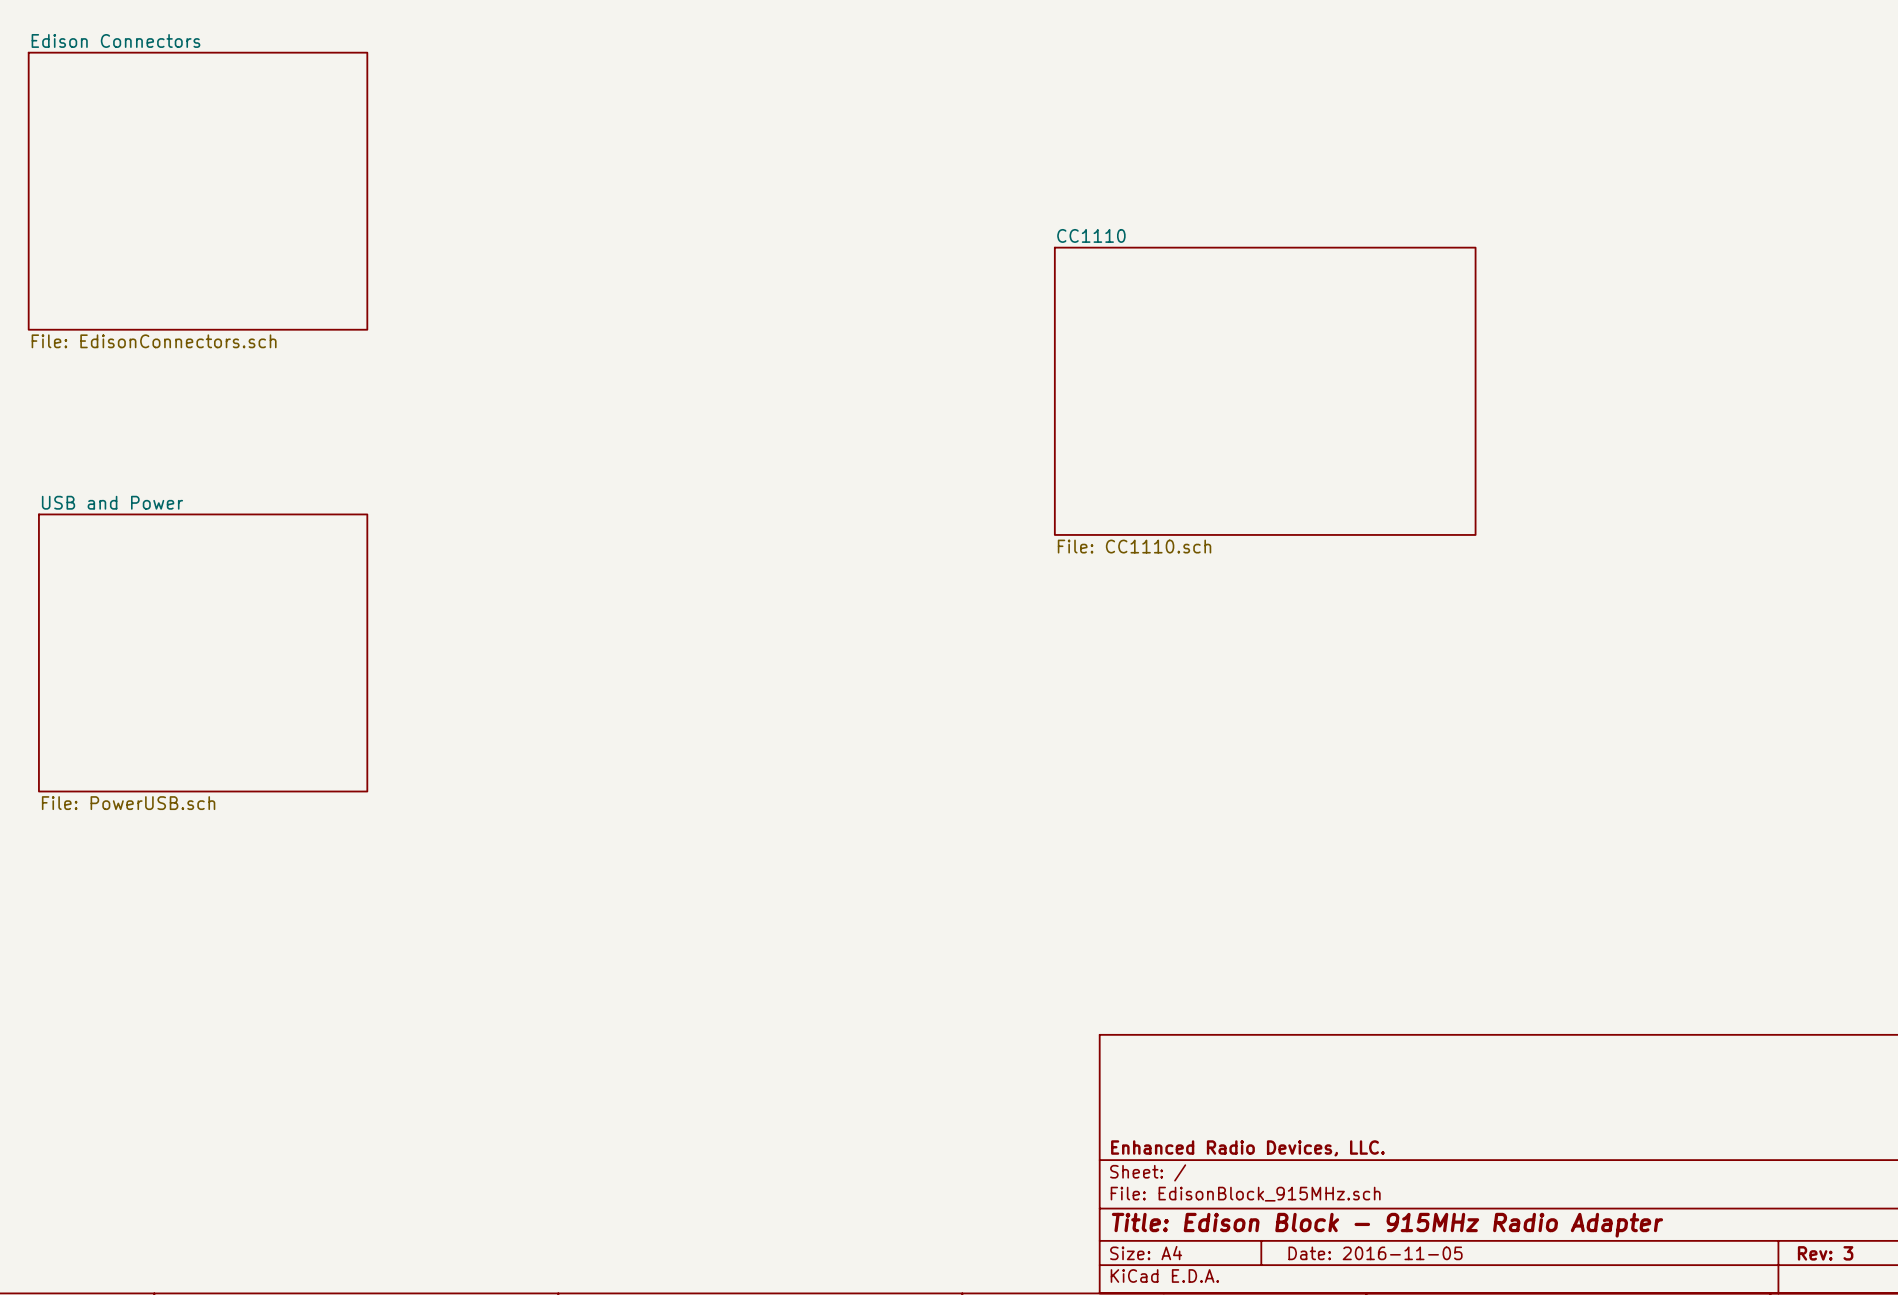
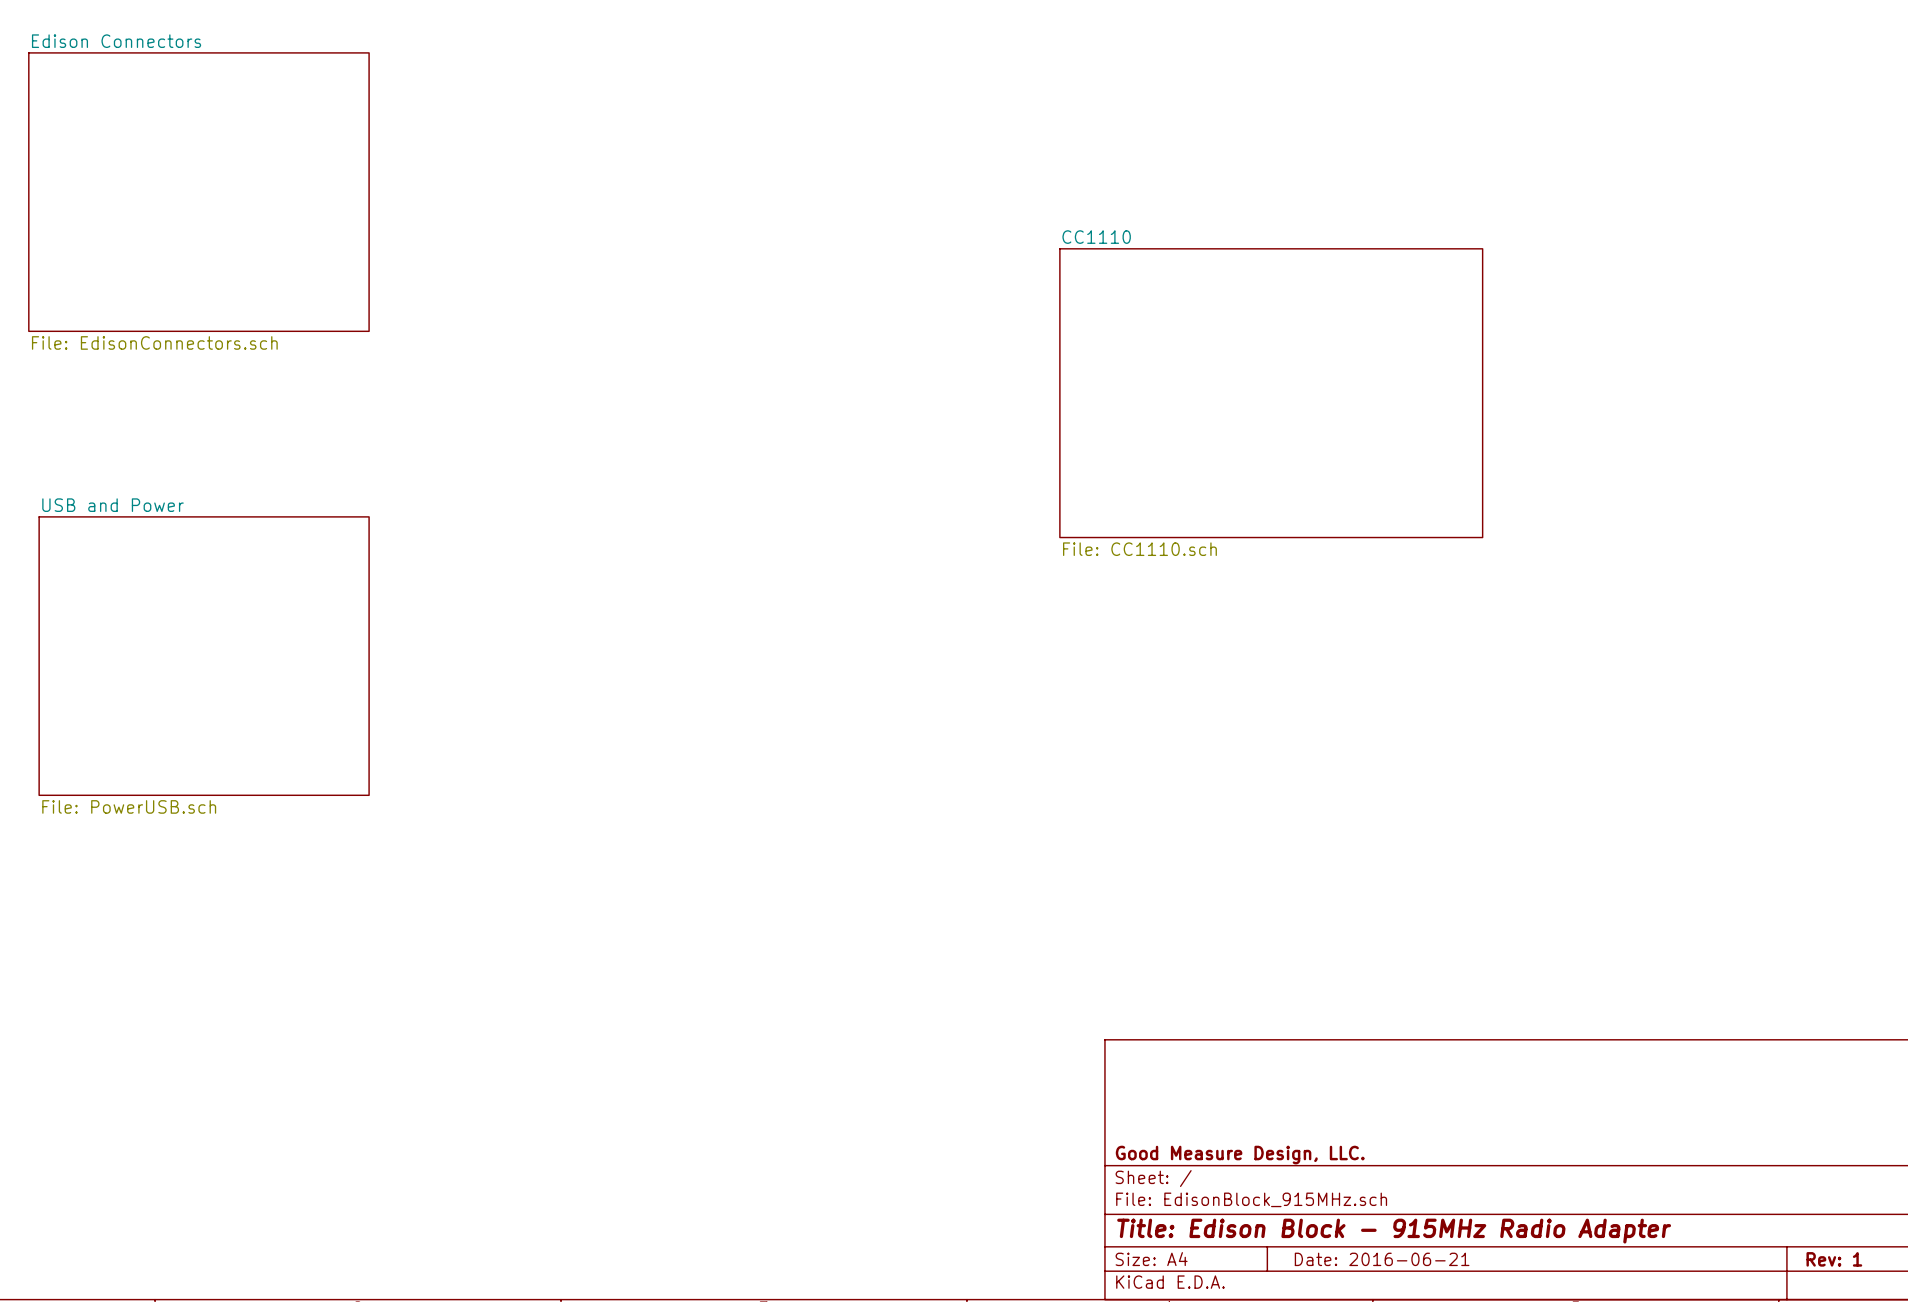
title block: Enhanced Radio Devices, LLC. (1247, 1148) -> Good Measure Design, LLC. (1240, 1155)
title block: Date: 2016-11-05 (1375, 1253) -> Date: 2016-06-21 (1382, 1259)
title block: Rev: 3 (1825, 1253) -> Rev: 1 (1834, 1259)

